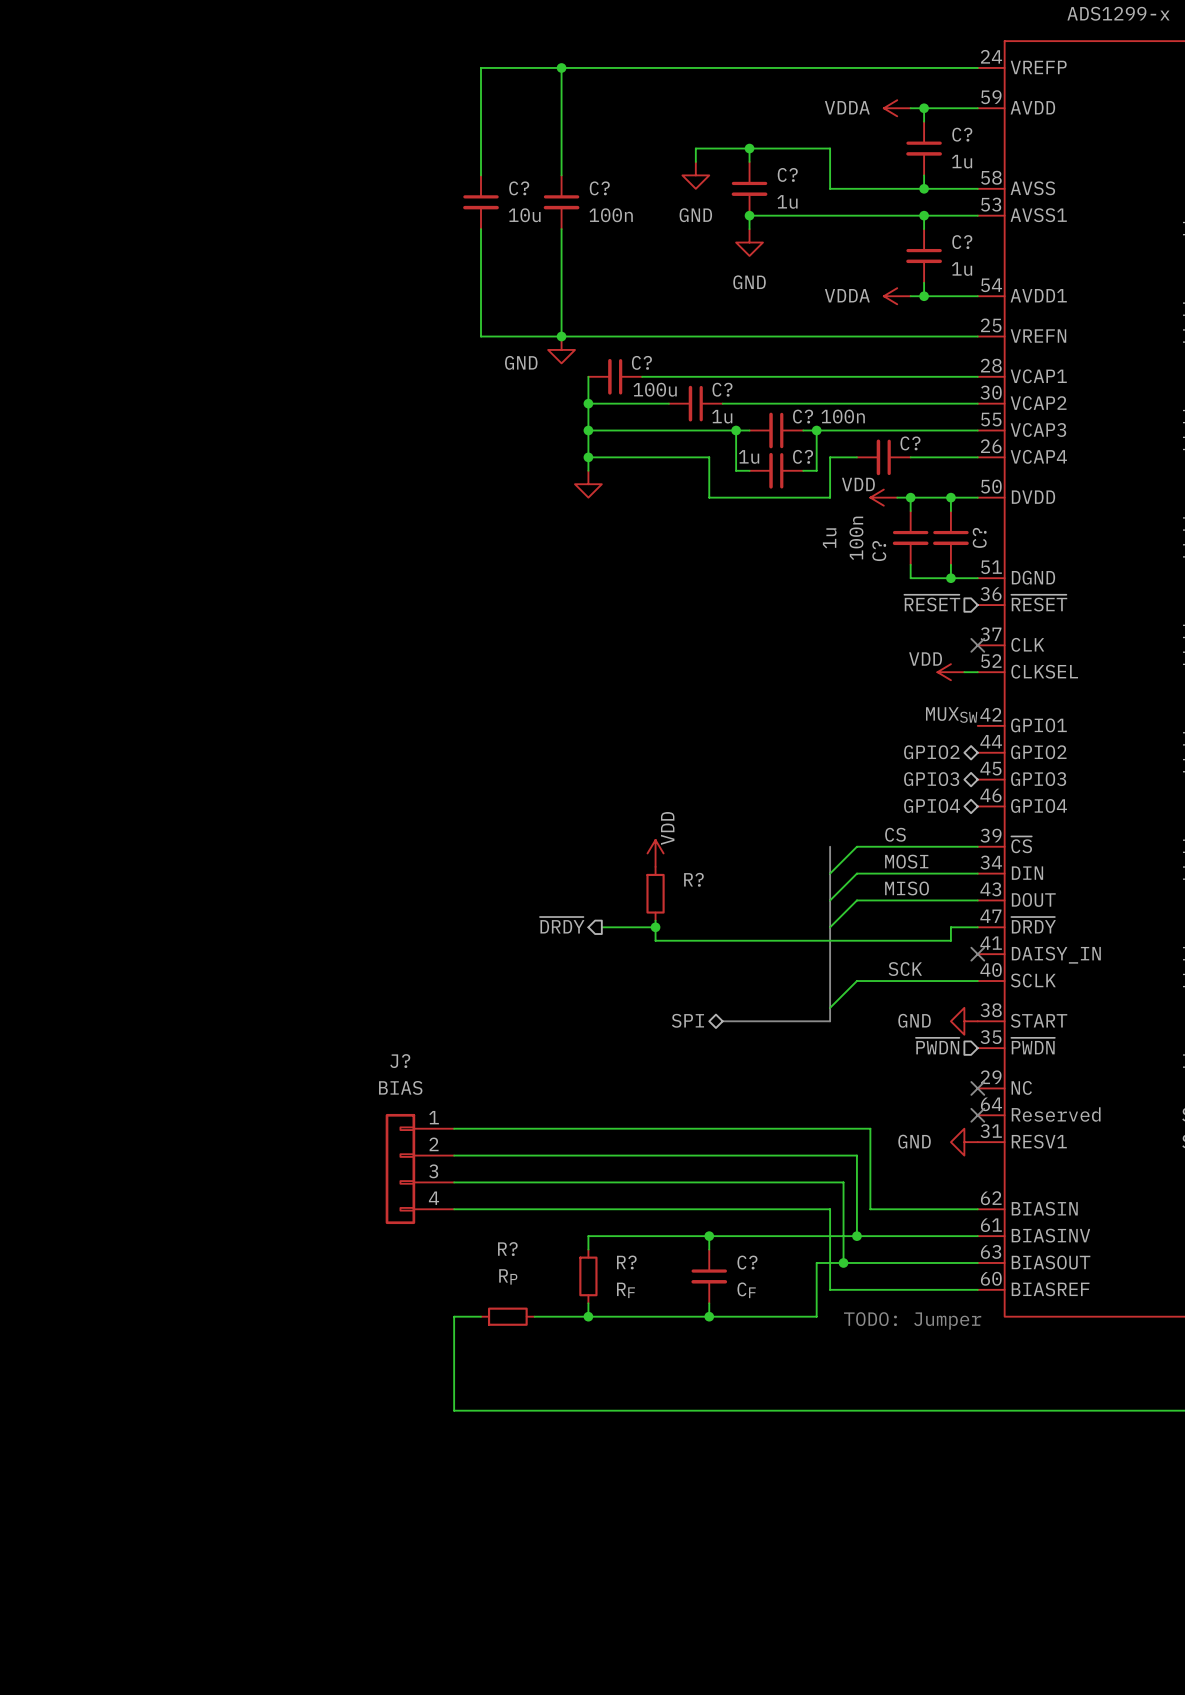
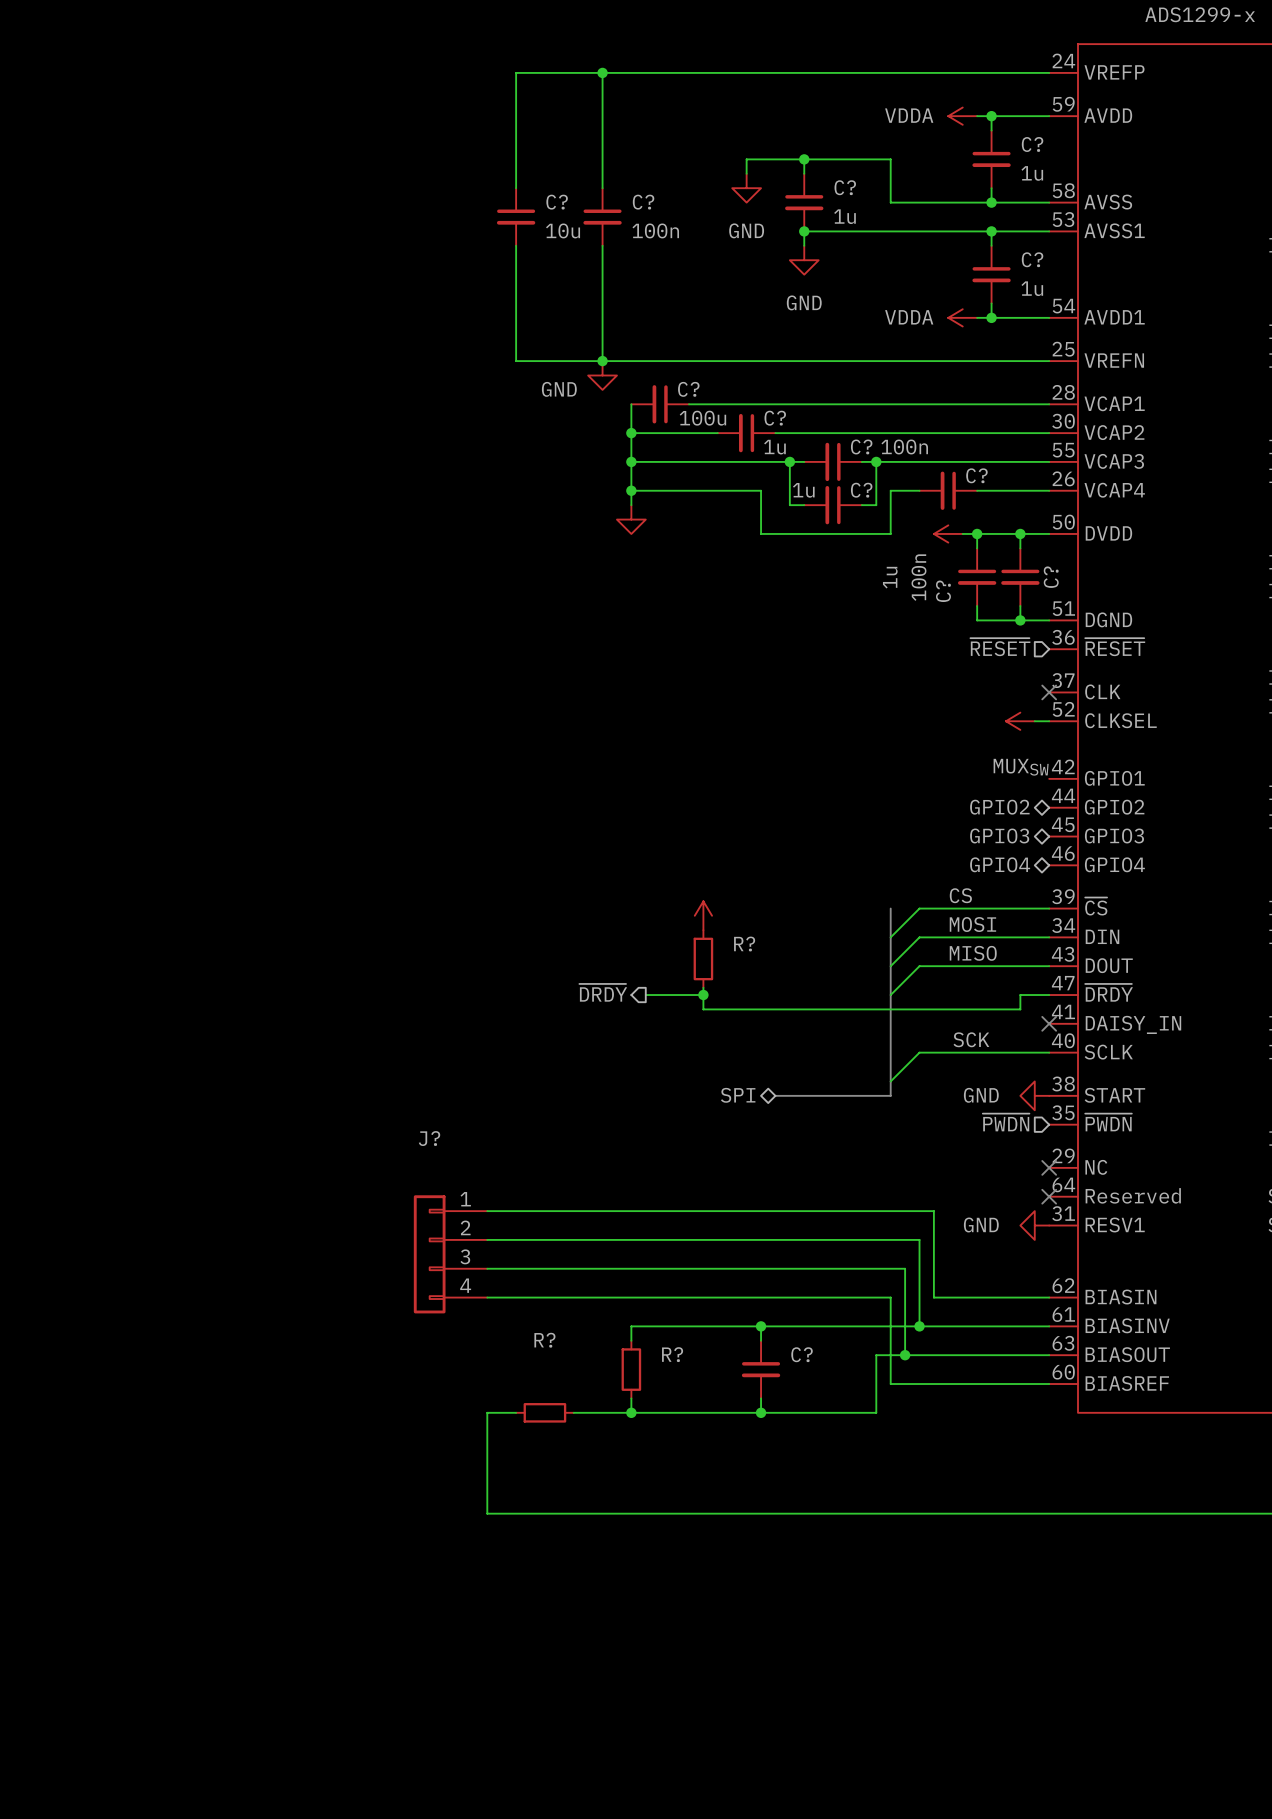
power symbol text: VDD (858, 484) -> none
power symbol text: VDD (925, 659) -> none
power symbol text: VDD (667, 828) -> none
J? value: BIAS (400, 1087) -> none
R? value: RP (508, 1276) -> none
R? value: RF (625, 1290) -> none
C? value: CF (746, 1290) -> none
text: TODO: Jumper (912, 1320) -> none

